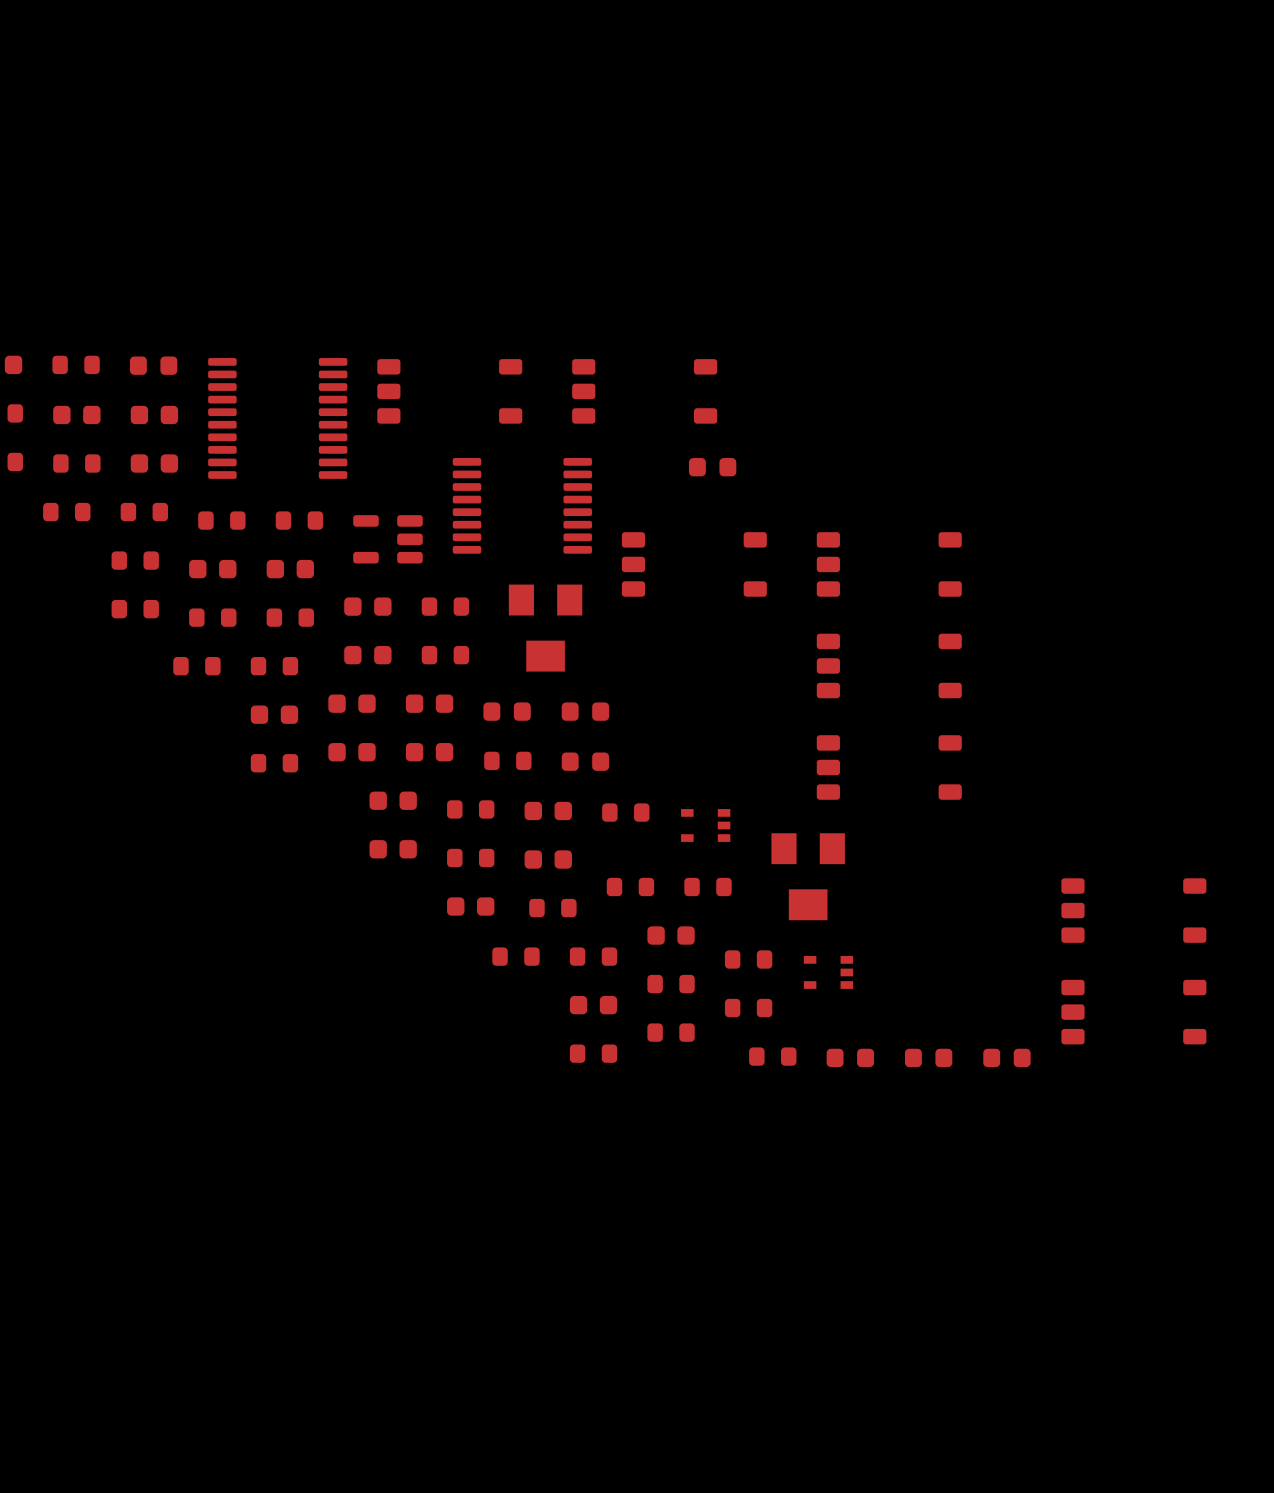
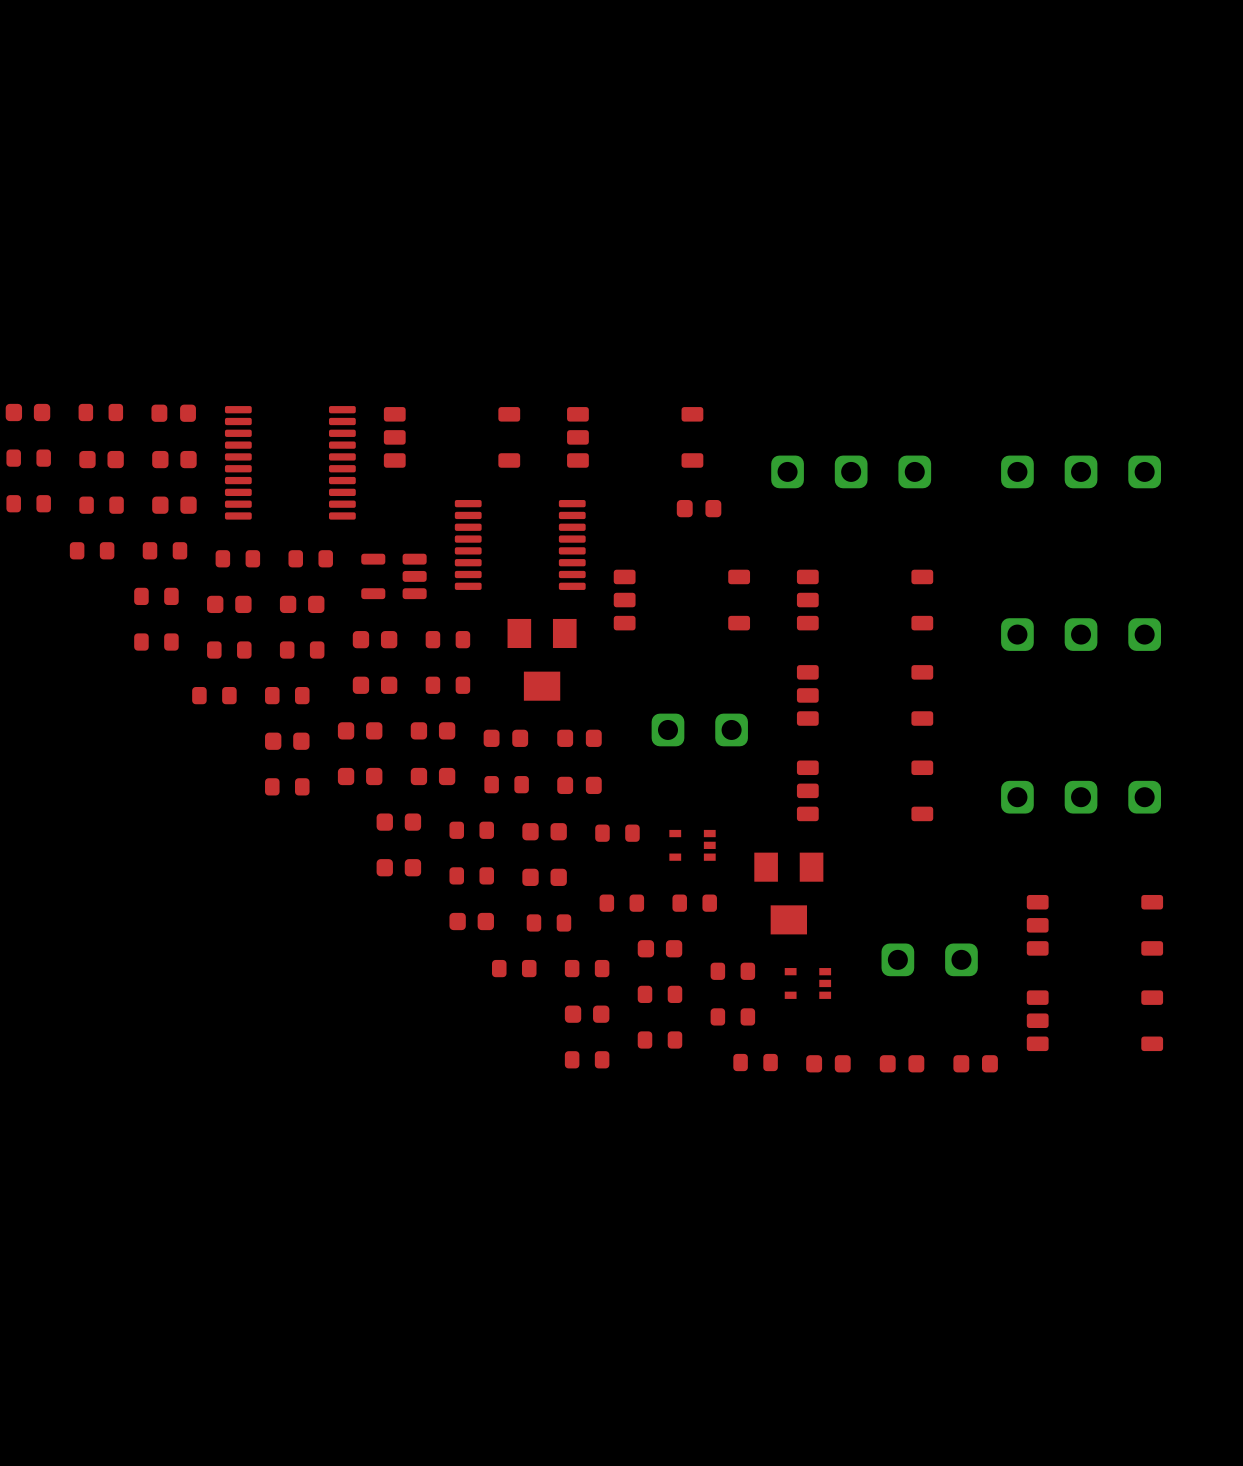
part: none -> (851, 471)
part: none -> (1081, 471)
part: none -> (1081, 634)
part: none -> (699, 729)
part: none -> (1081, 797)
part: none -> (929, 959)

